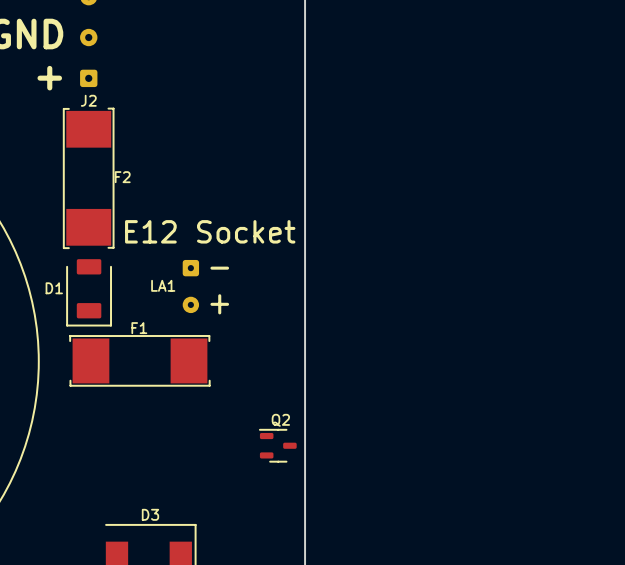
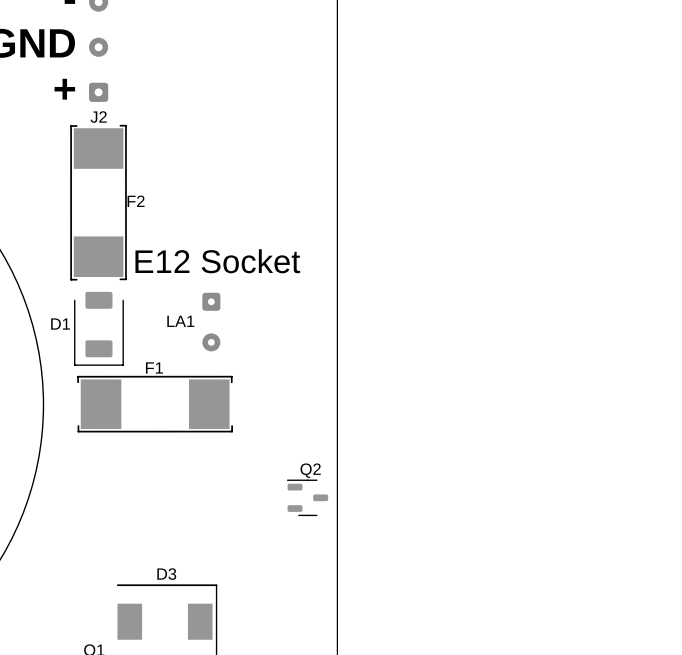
text: - (219, 268) -> none
text: + (219, 304) -> none

